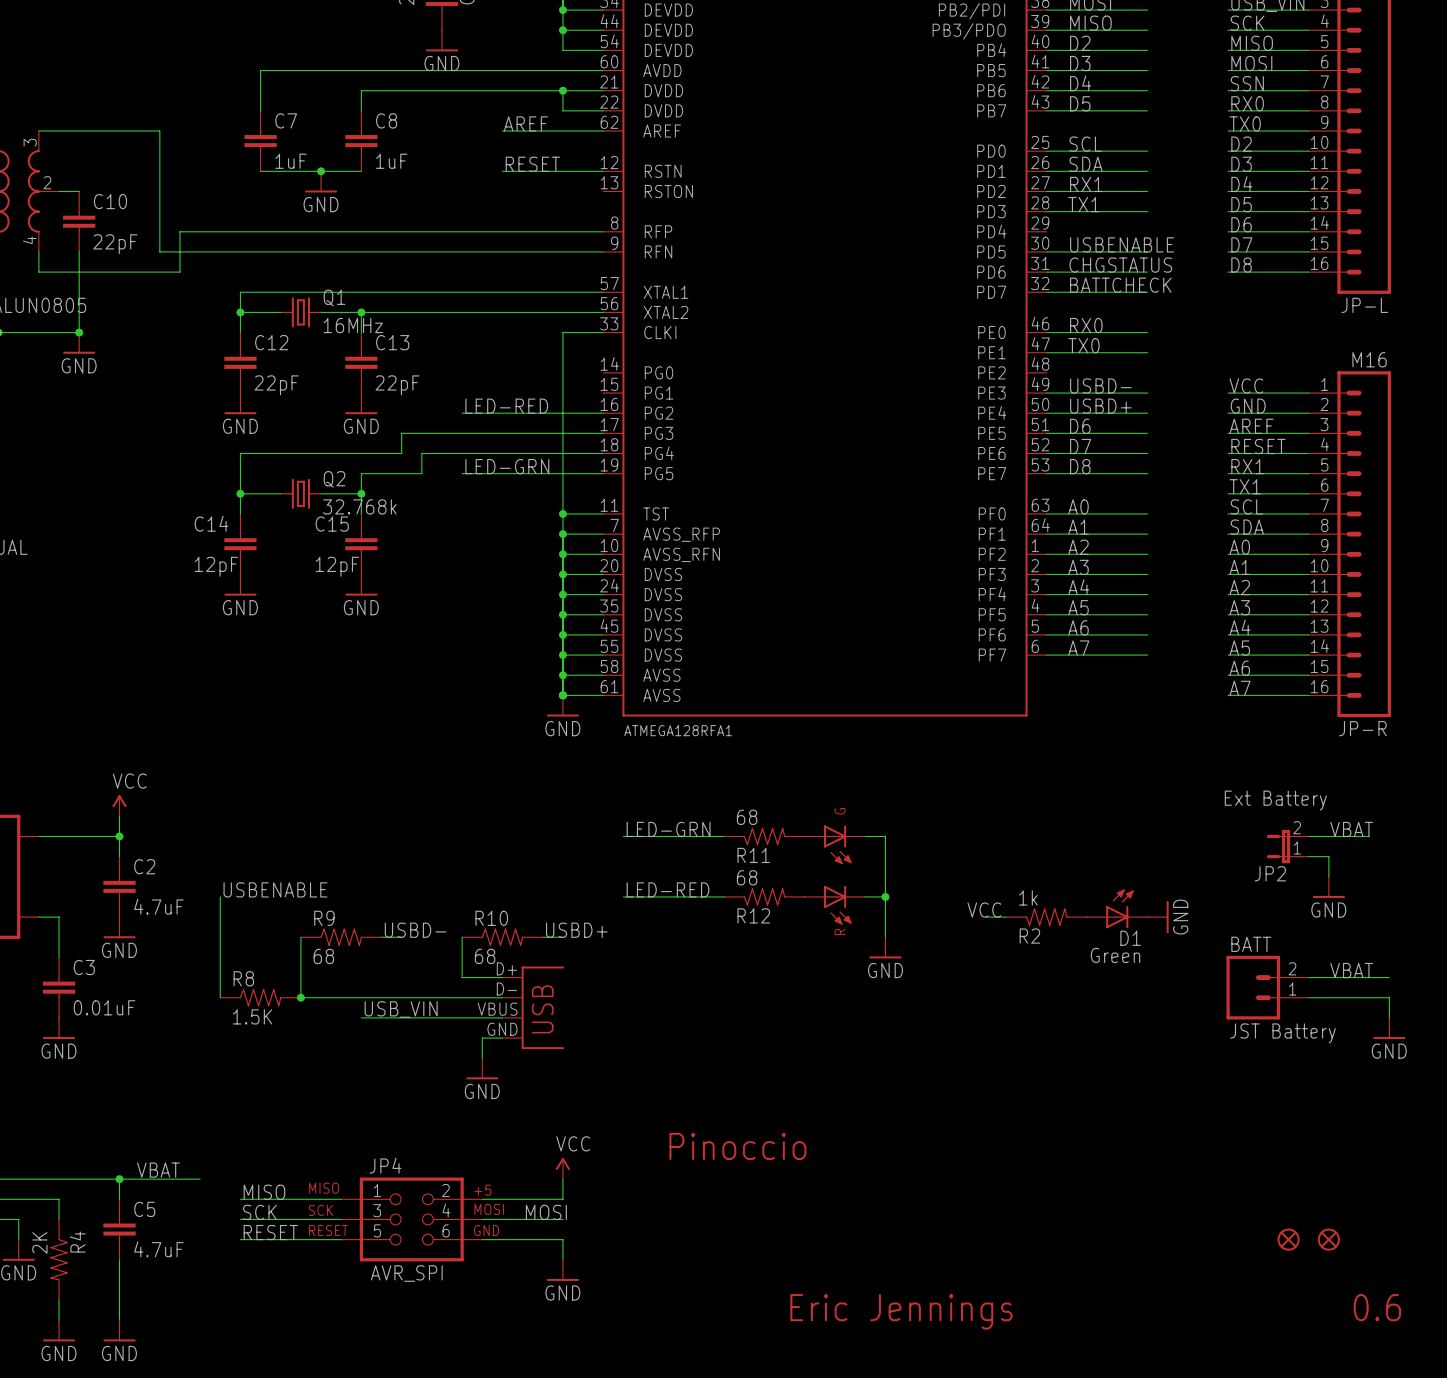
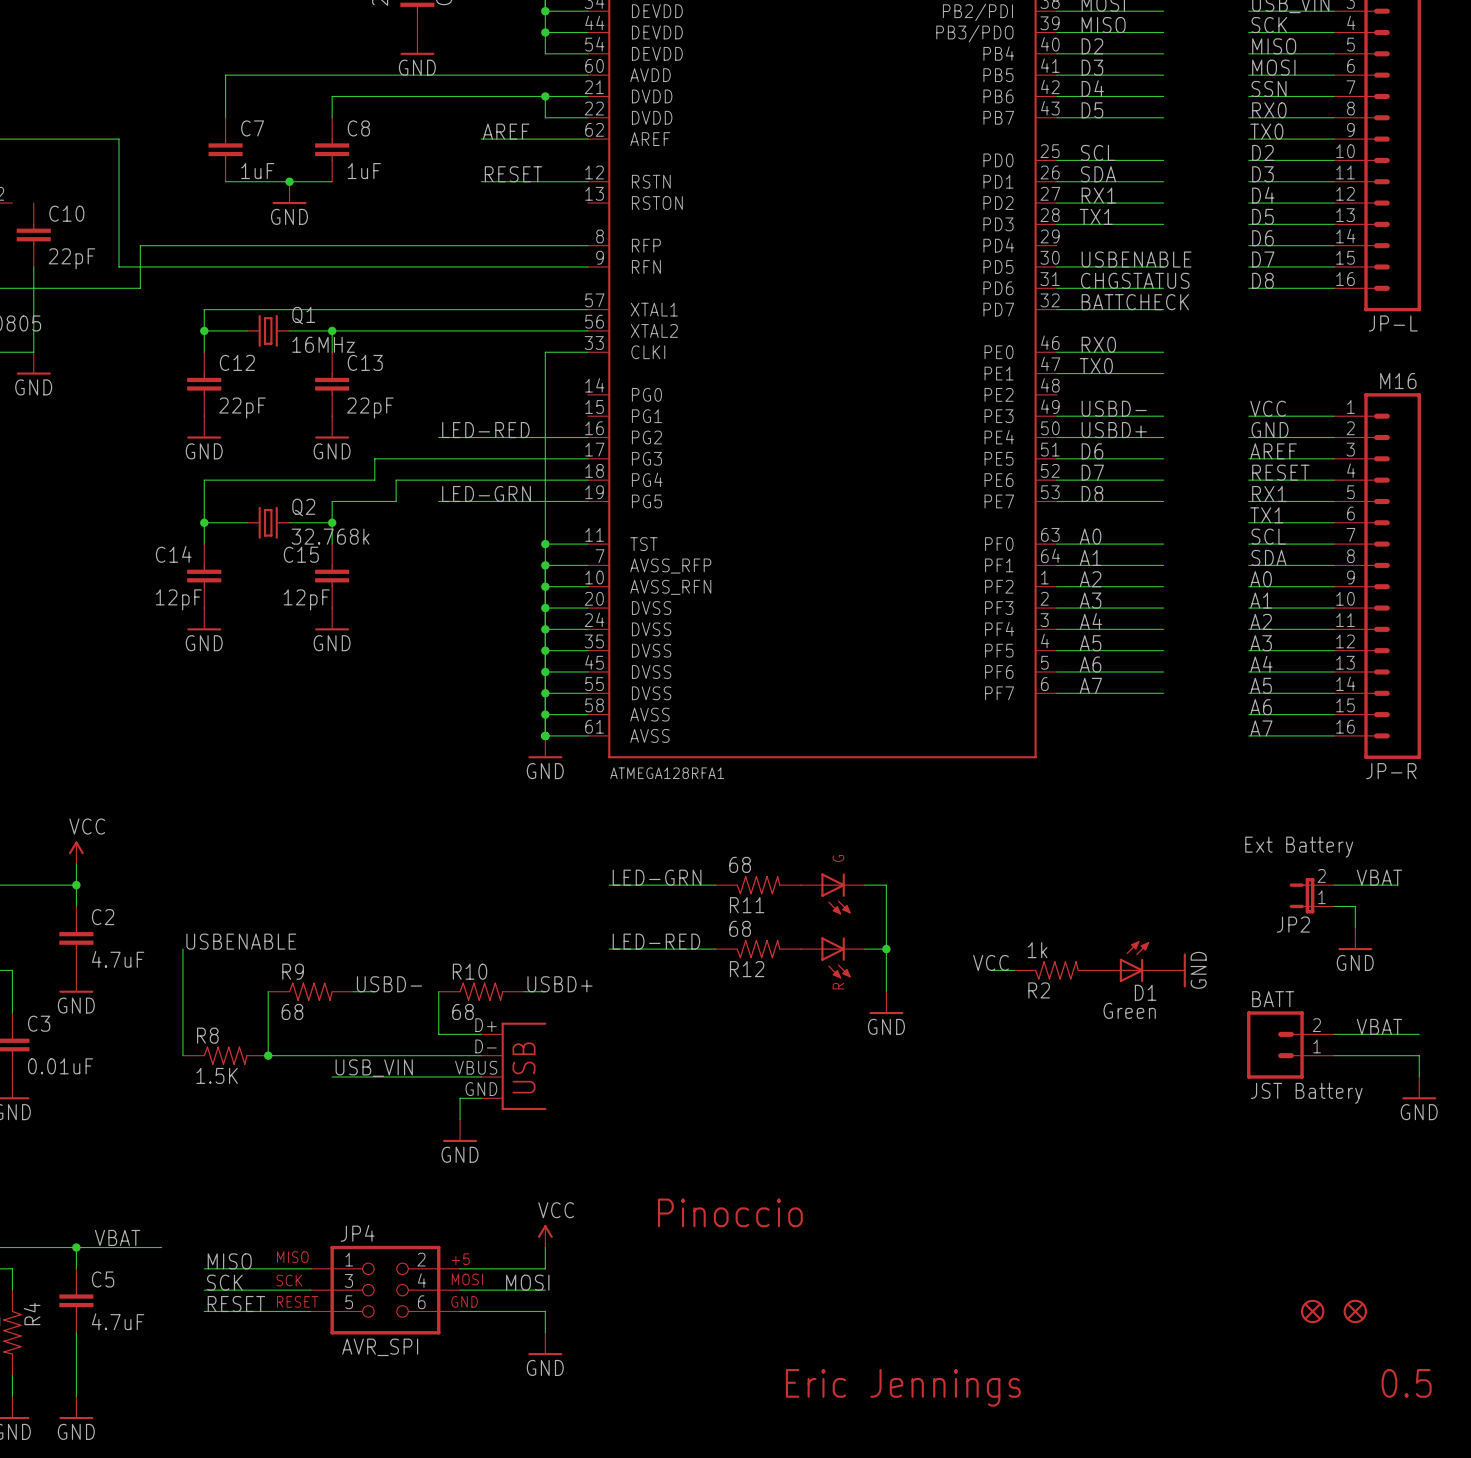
wire: (59, 191) (79, 191) -> none
junction: (79, 332) -> none
text: 0.6 (1377, 1307) -> 0.5 (1406, 1383)

